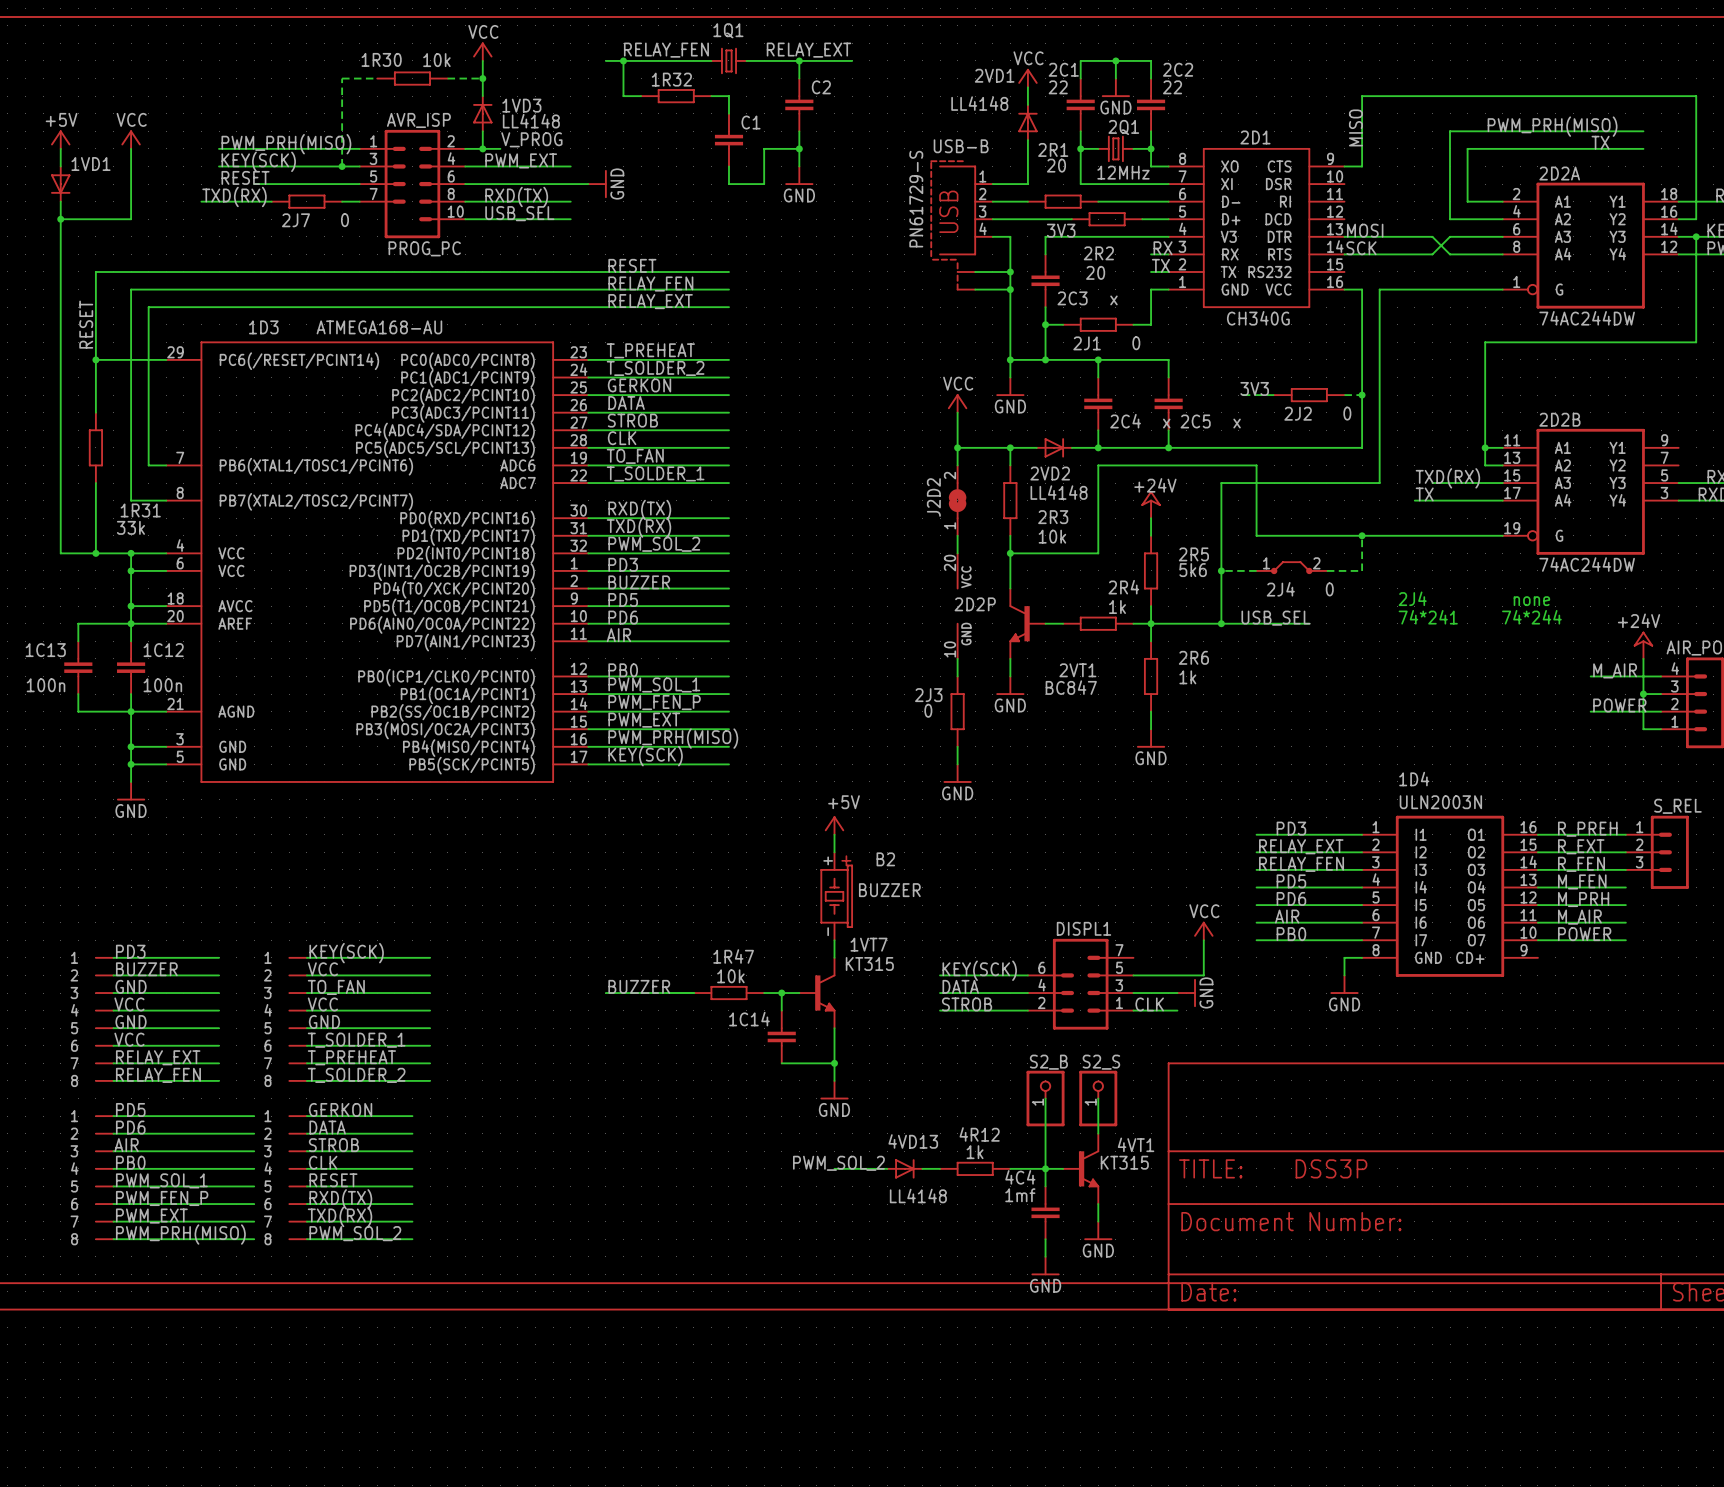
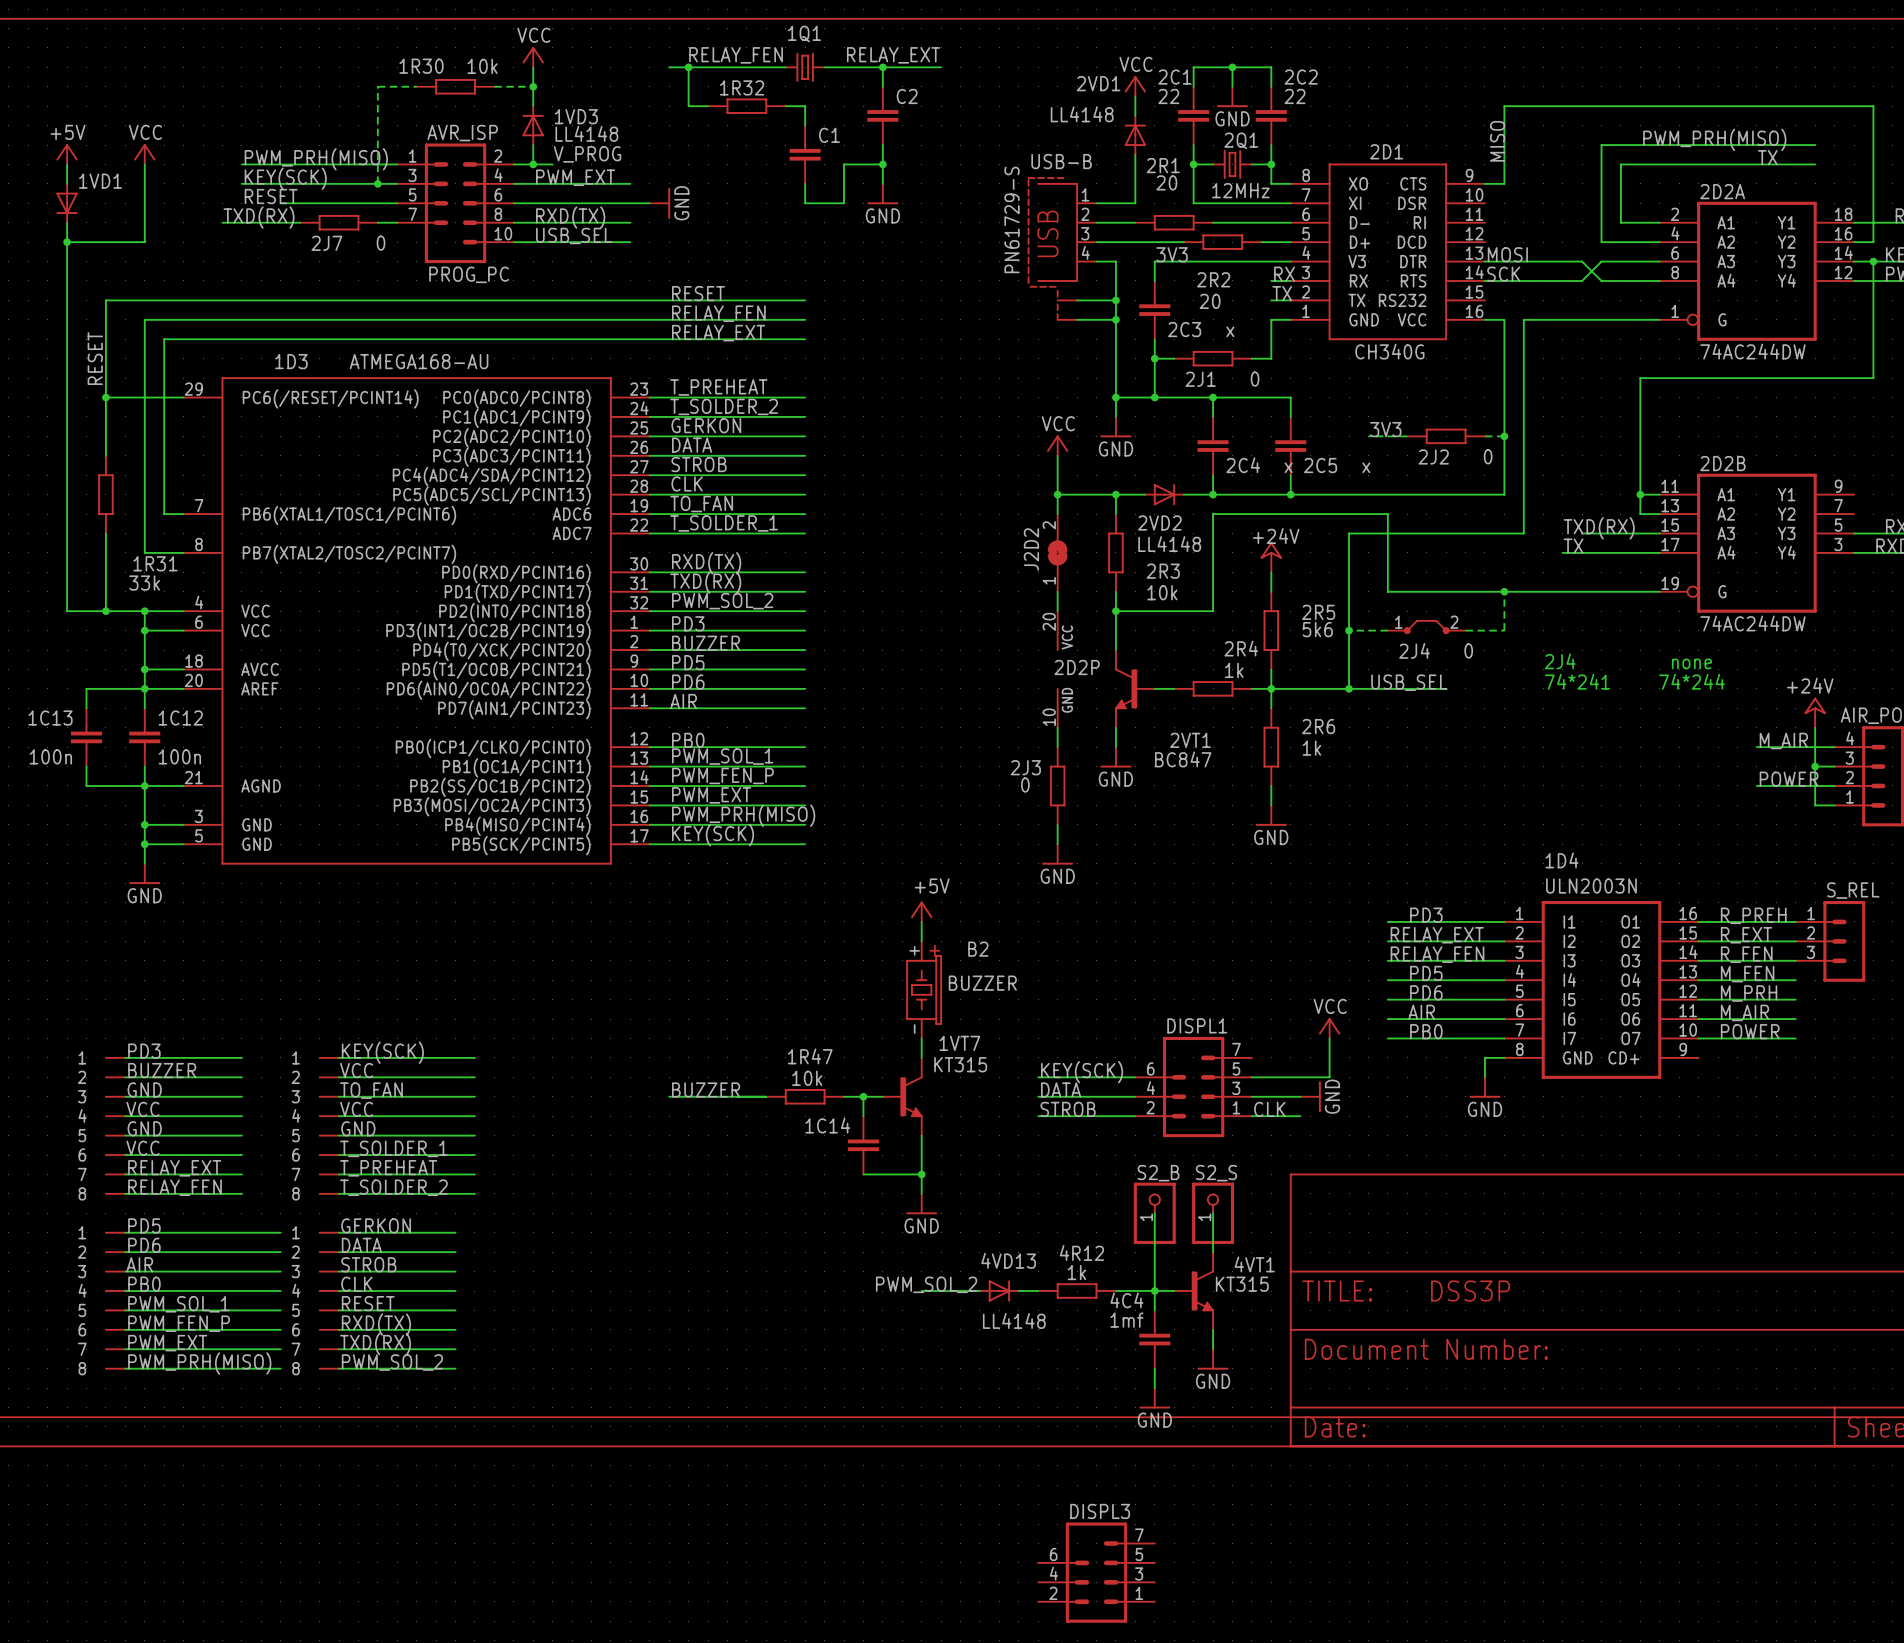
DISPL3: none -> (1096, 1572)

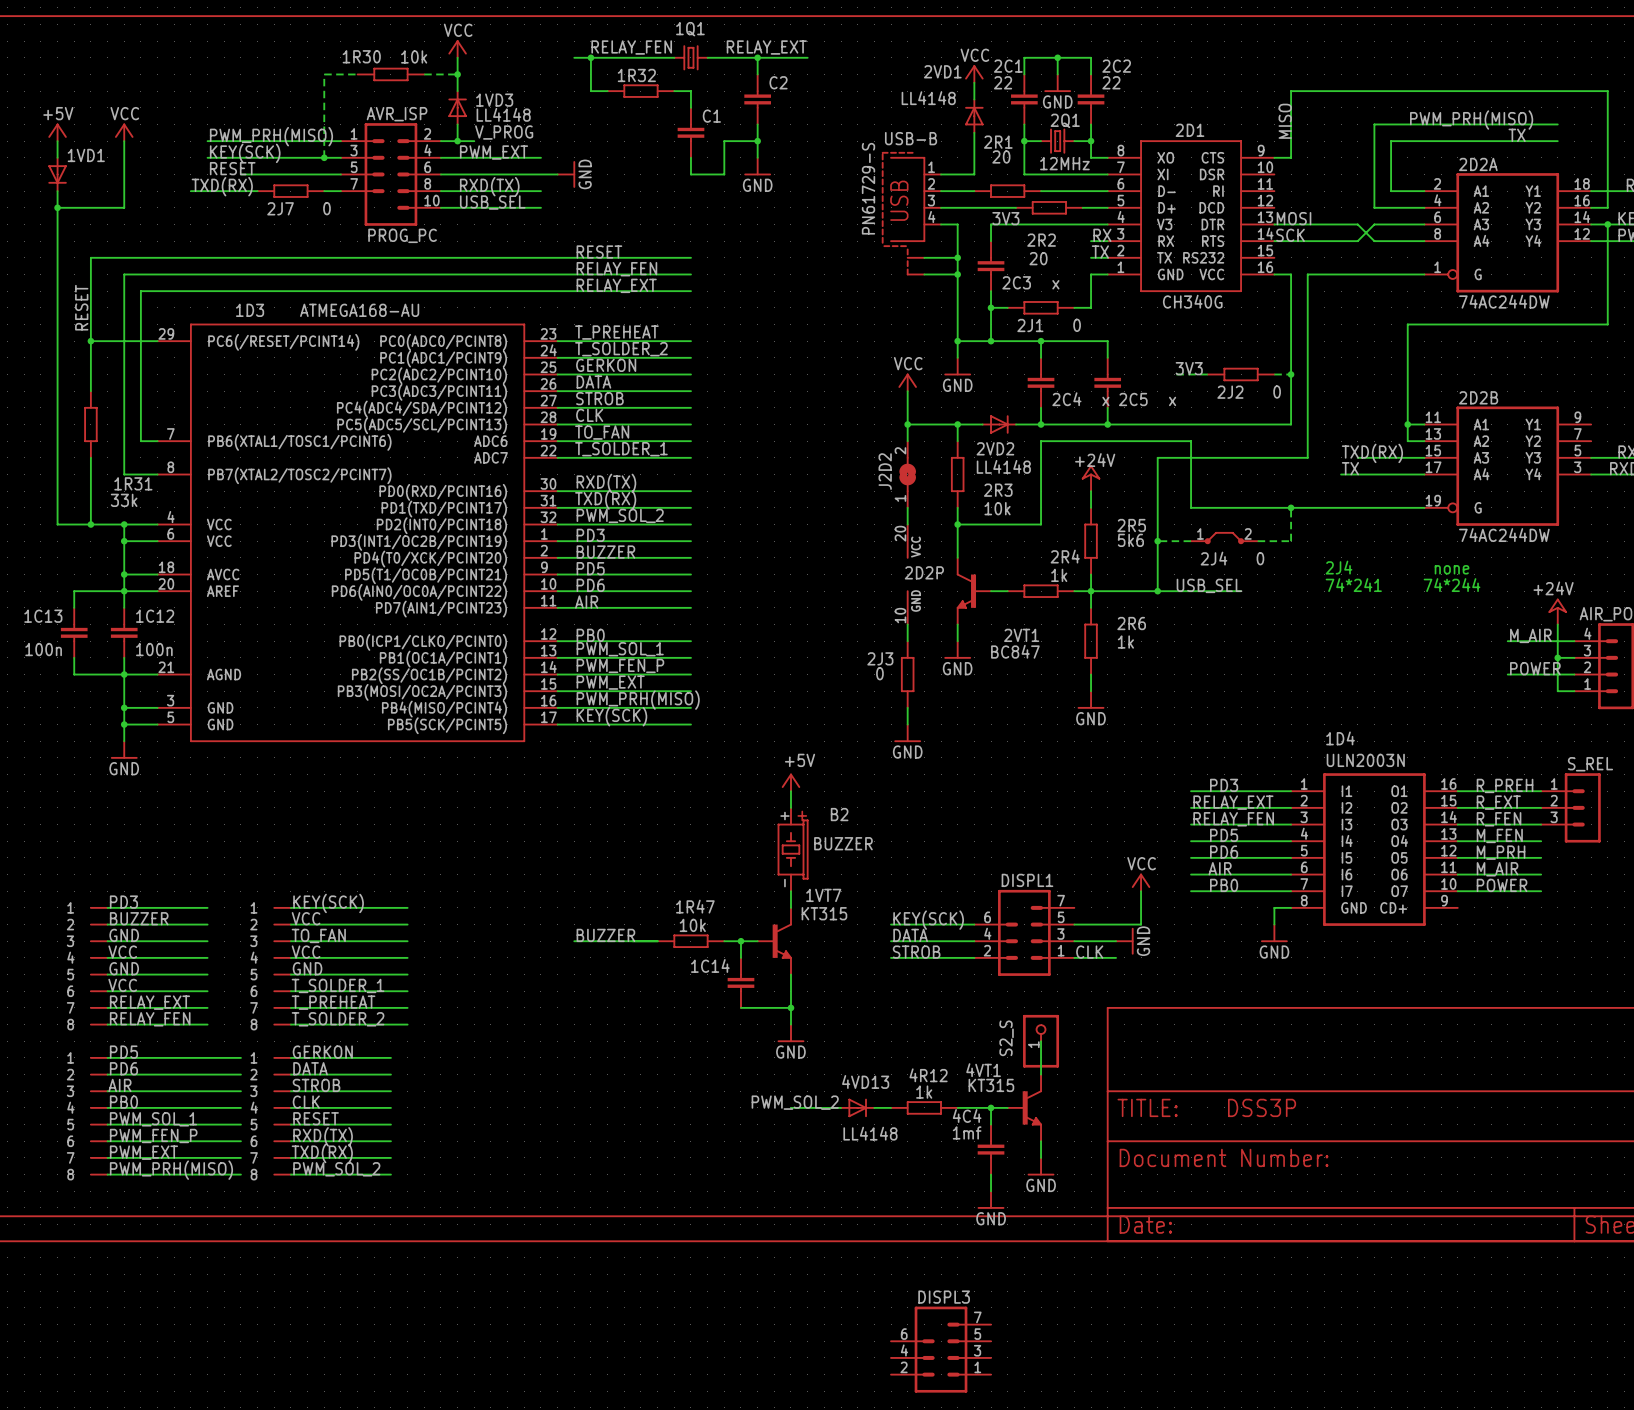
S2_S name rotation: 0° (1216, 1173) -> 90° counterclockwise (1006, 1038)
S2_S name position: S2_S (1216, 1173) -> S2_S (1006, 1038)
wire: (1154, 1213) (1154, 1291) -> none
S2_B: (1154, 1213) -> none
4VT1 name position: 4VT1 (1254, 1264) -> 4VT1 (983, 1070)
4VT1 value position: KT315 (1242, 1284) -> KT315 (991, 1085)

